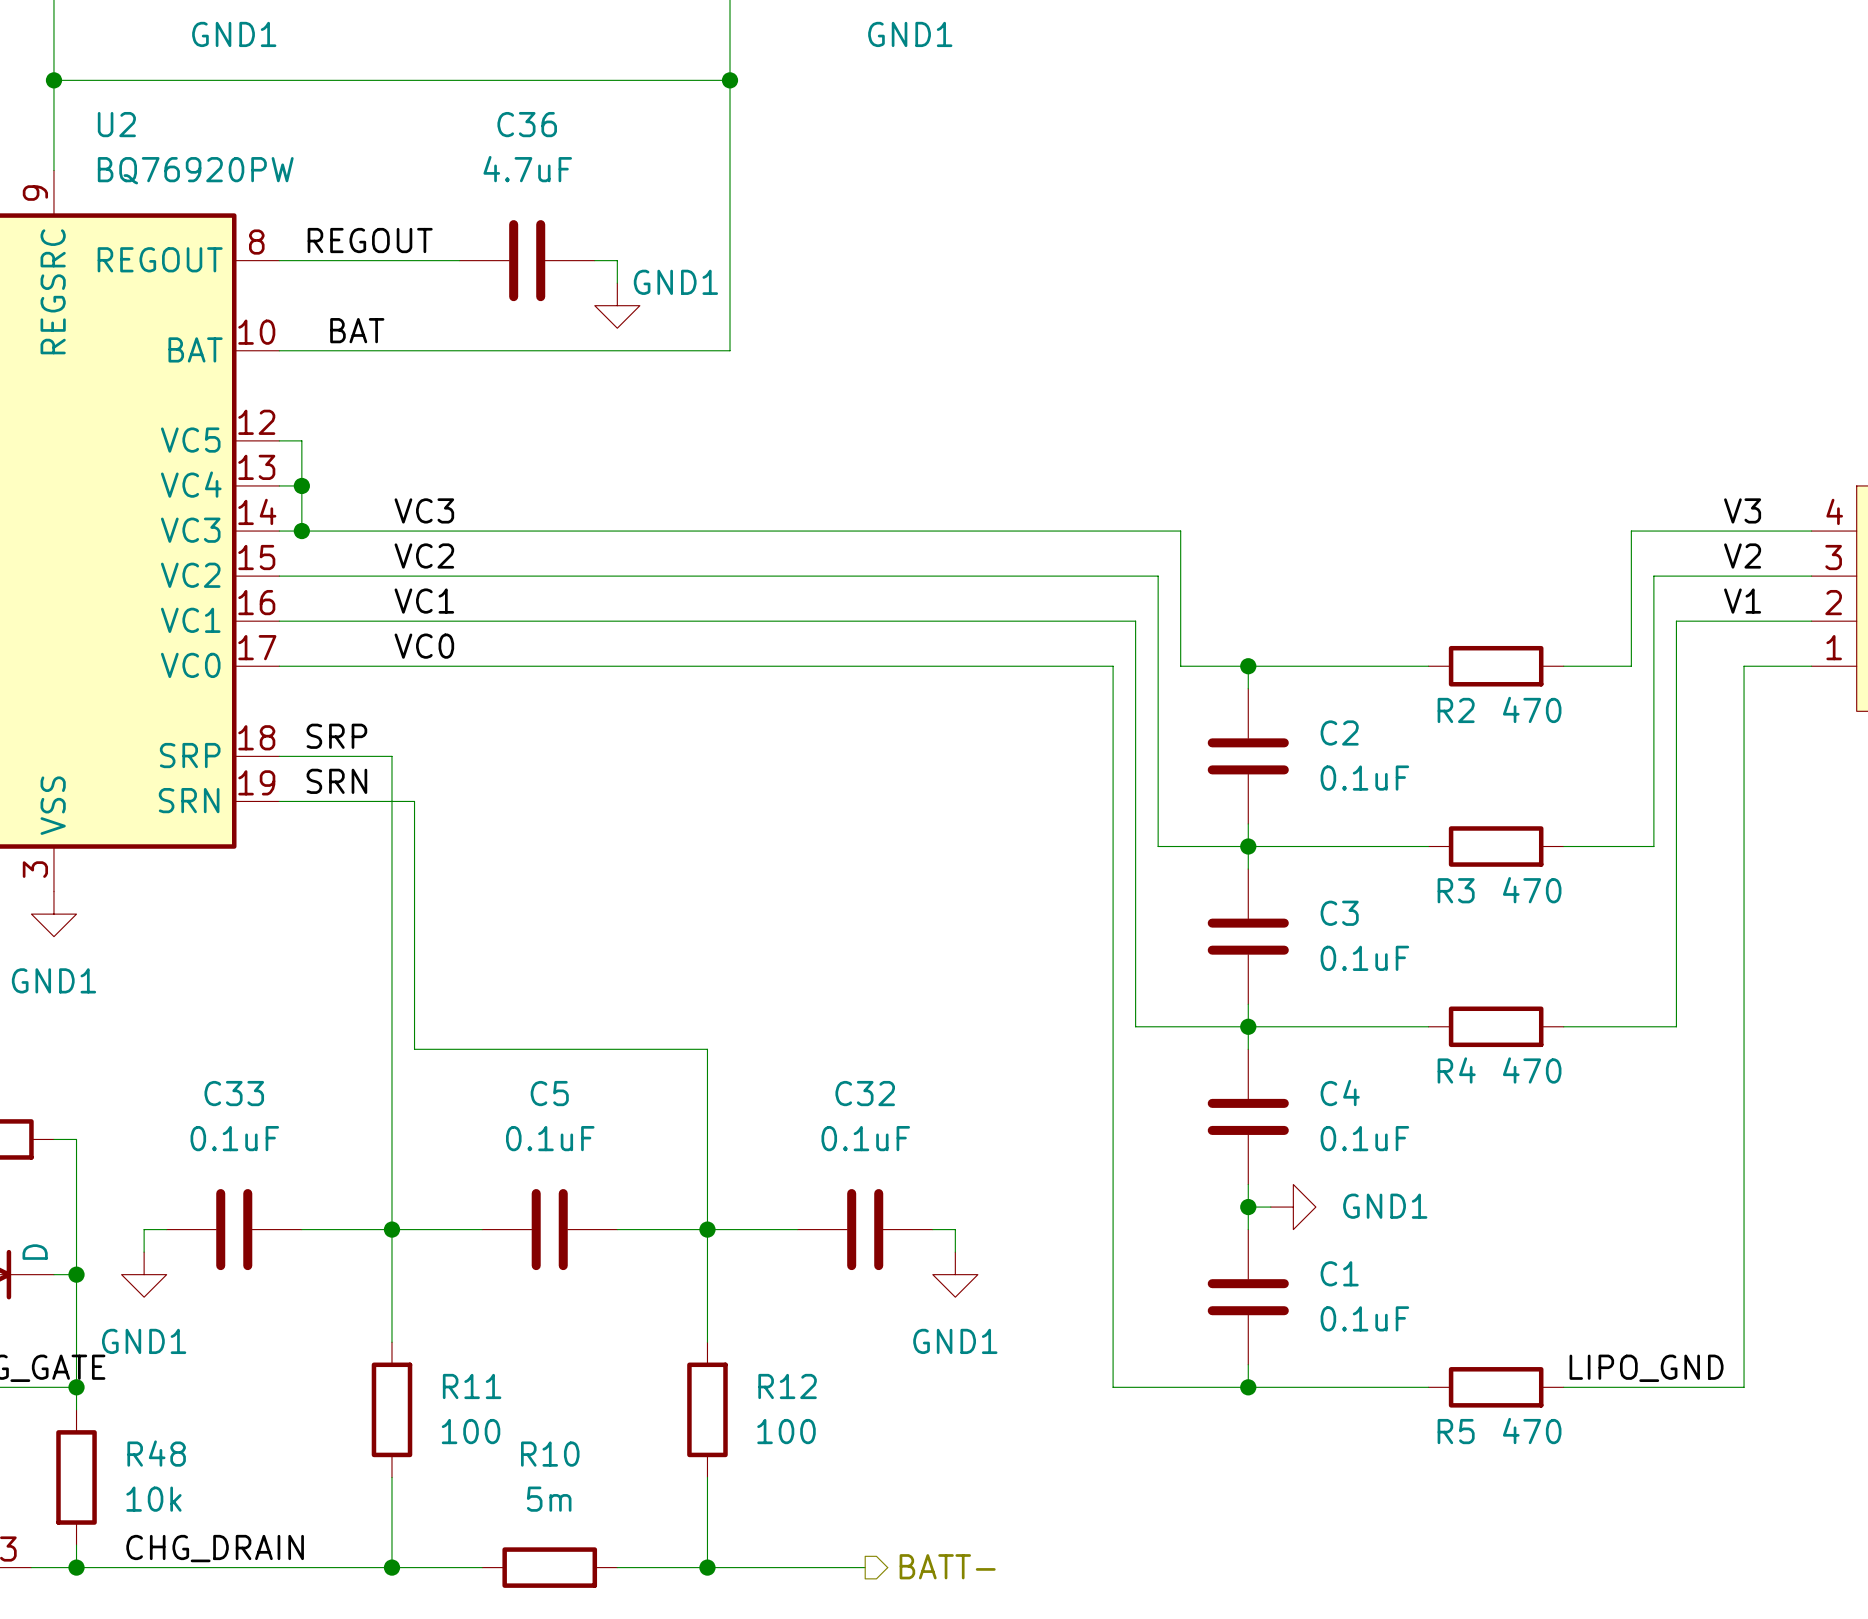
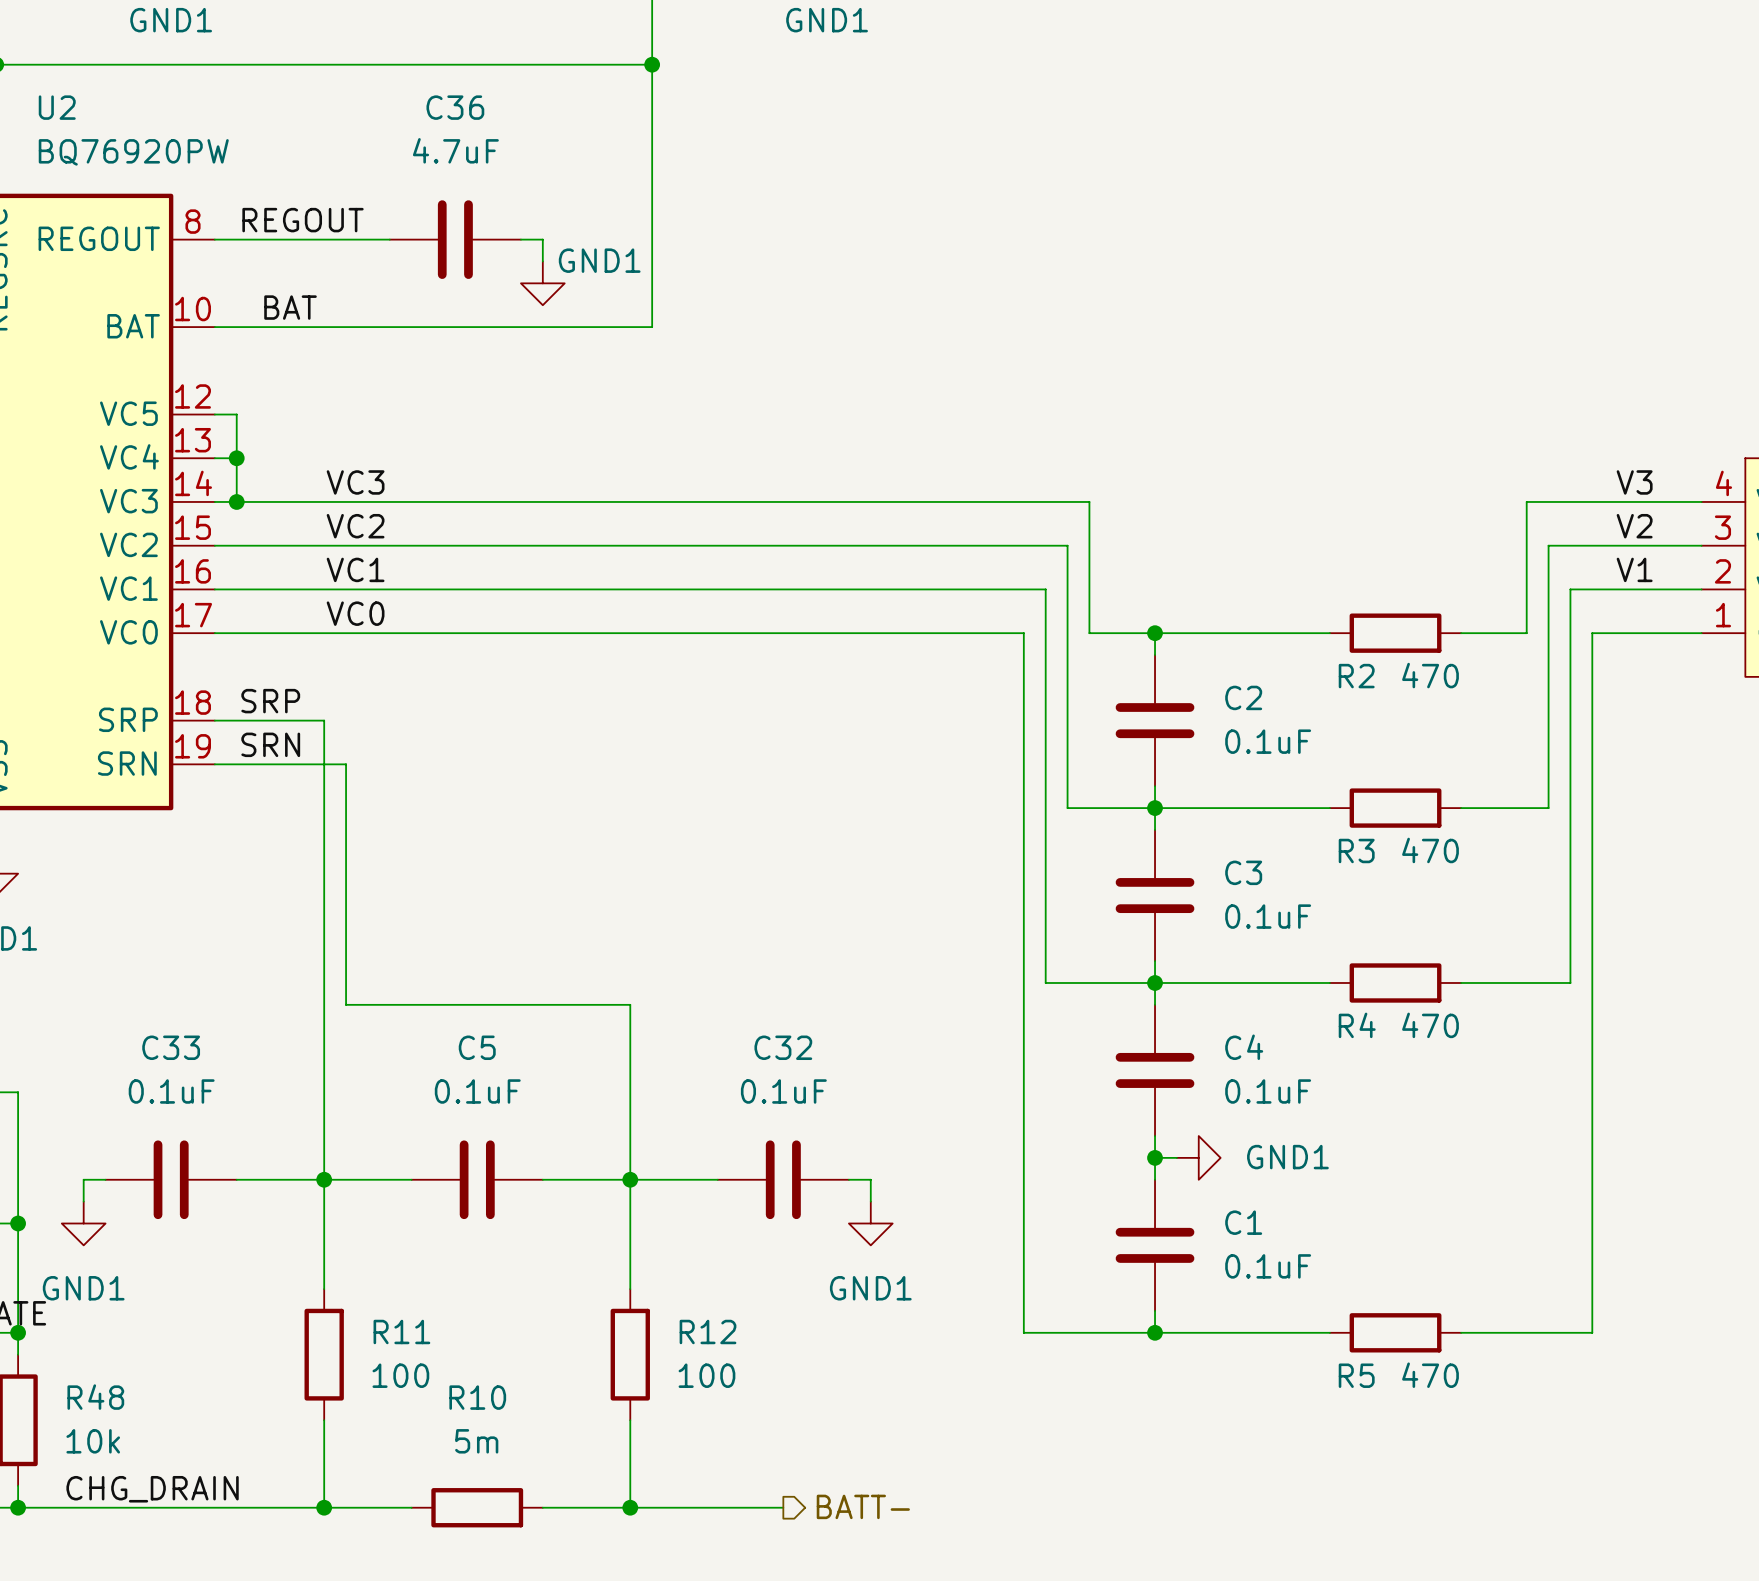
wire: (1744, 666) (1744, 1387) (1698, 1387) -> (1636, 633) (1592, 633) (1592, 1332)
label: LIPO_GND (1646, 1368) -> none

